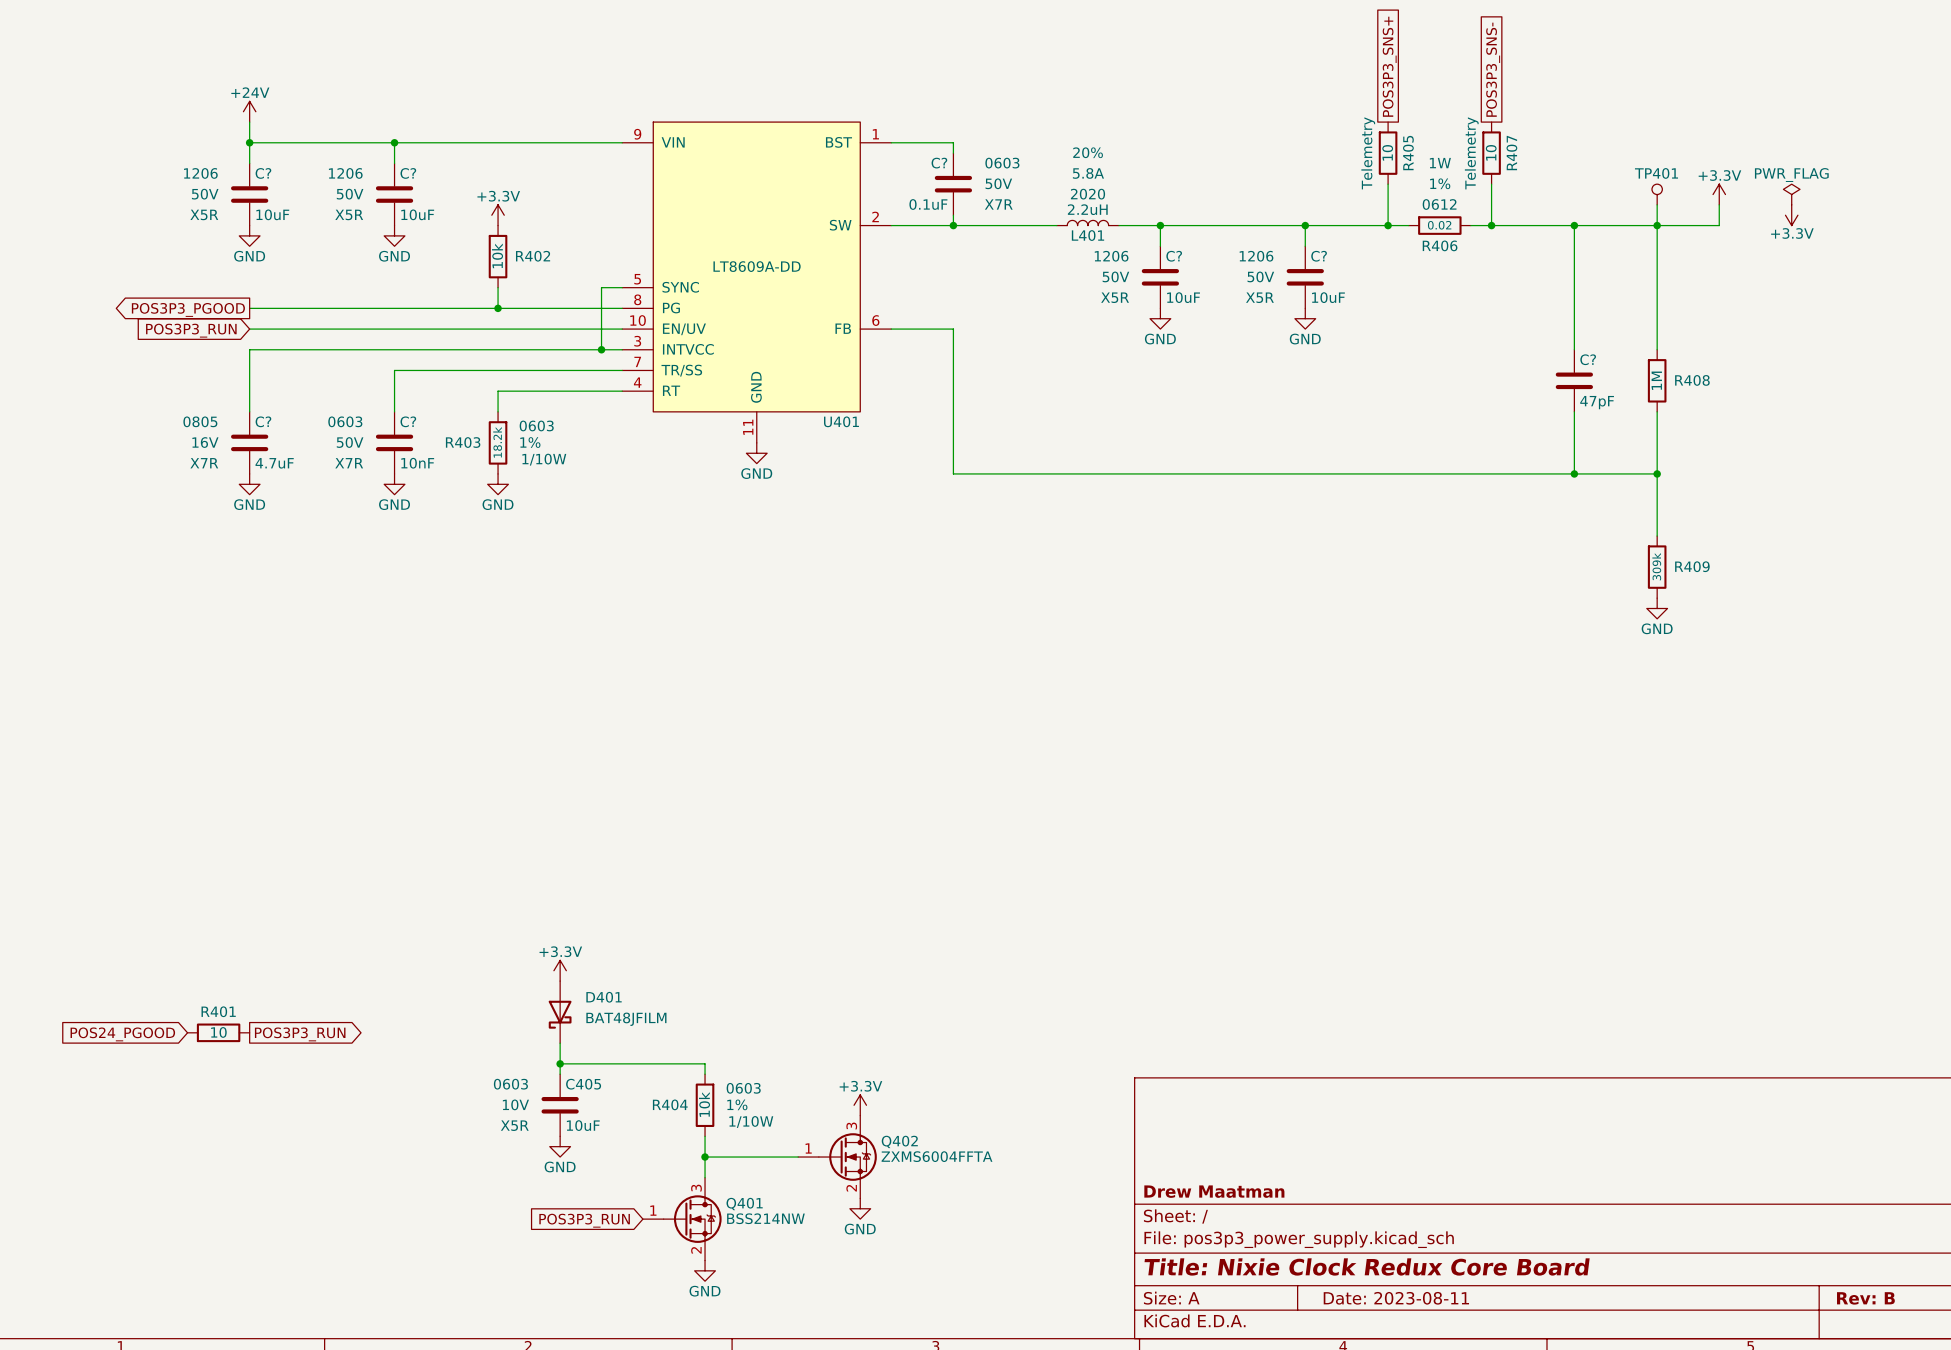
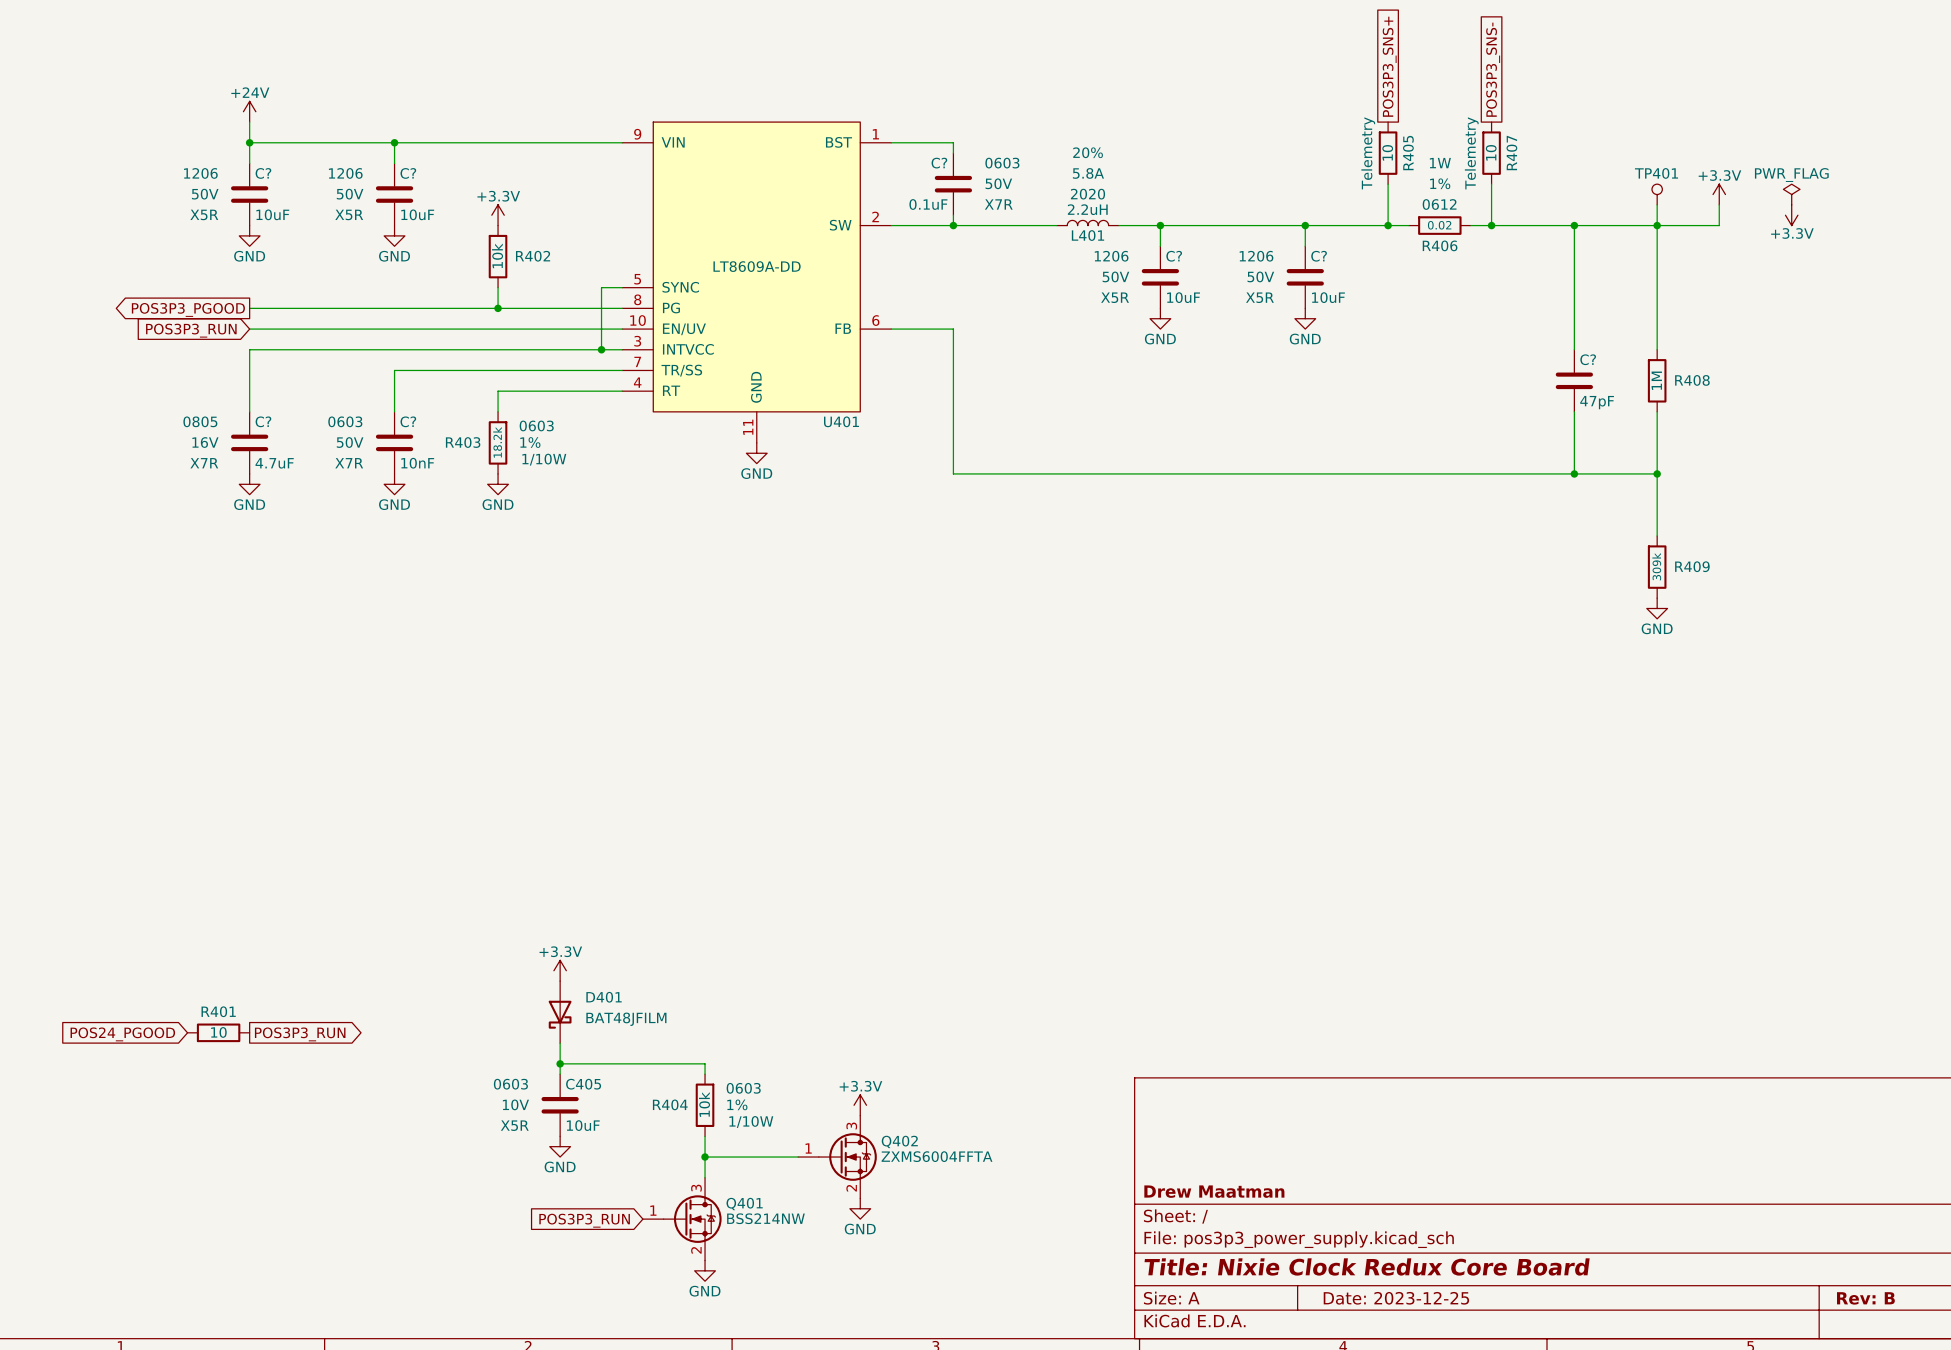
title block: Date: 2023-08-11 (1396, 1298) -> Date: 2023-12-25 (1396, 1298)

